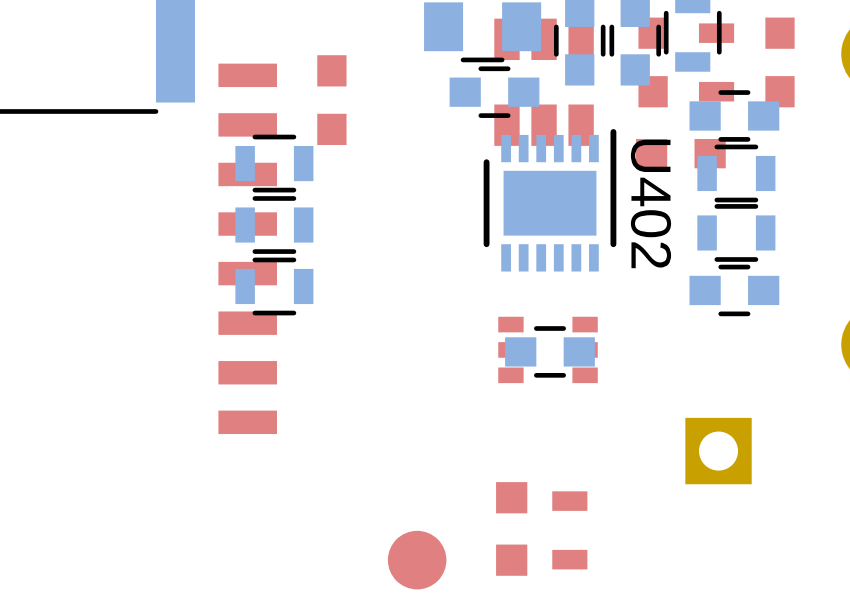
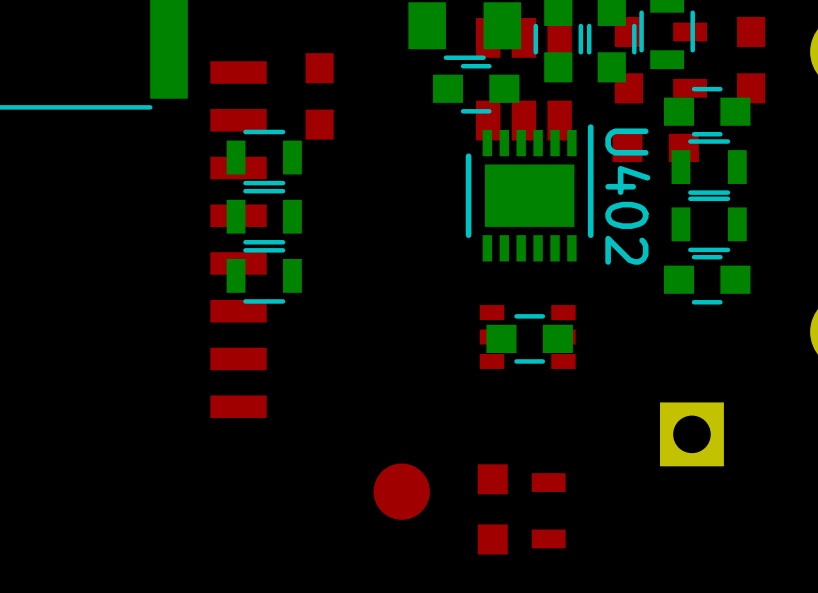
part position: (417, 560) -> (401, 491)

